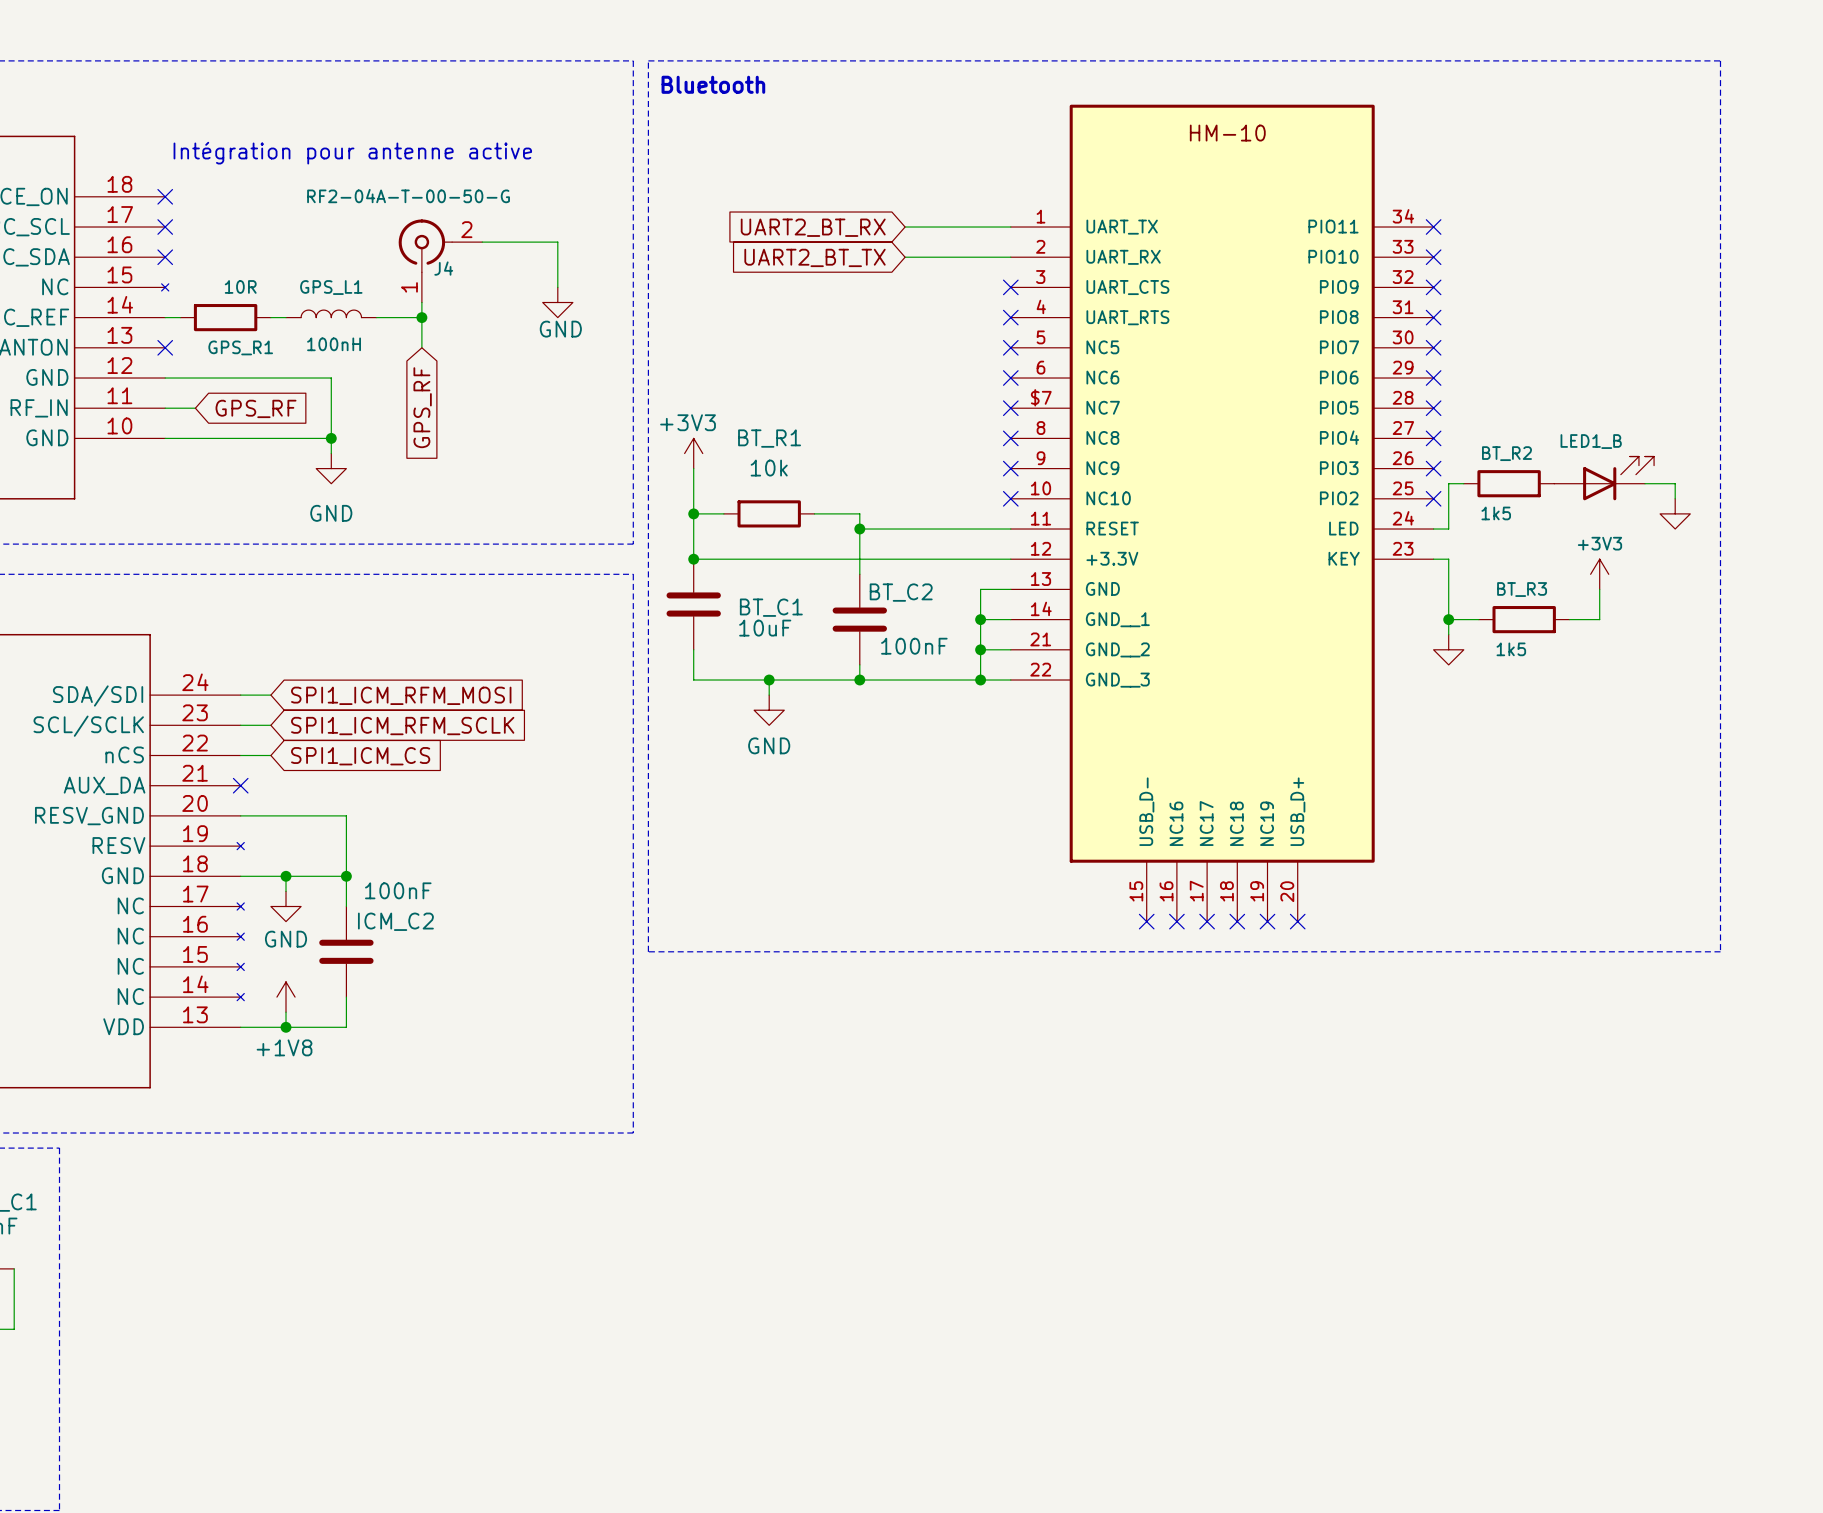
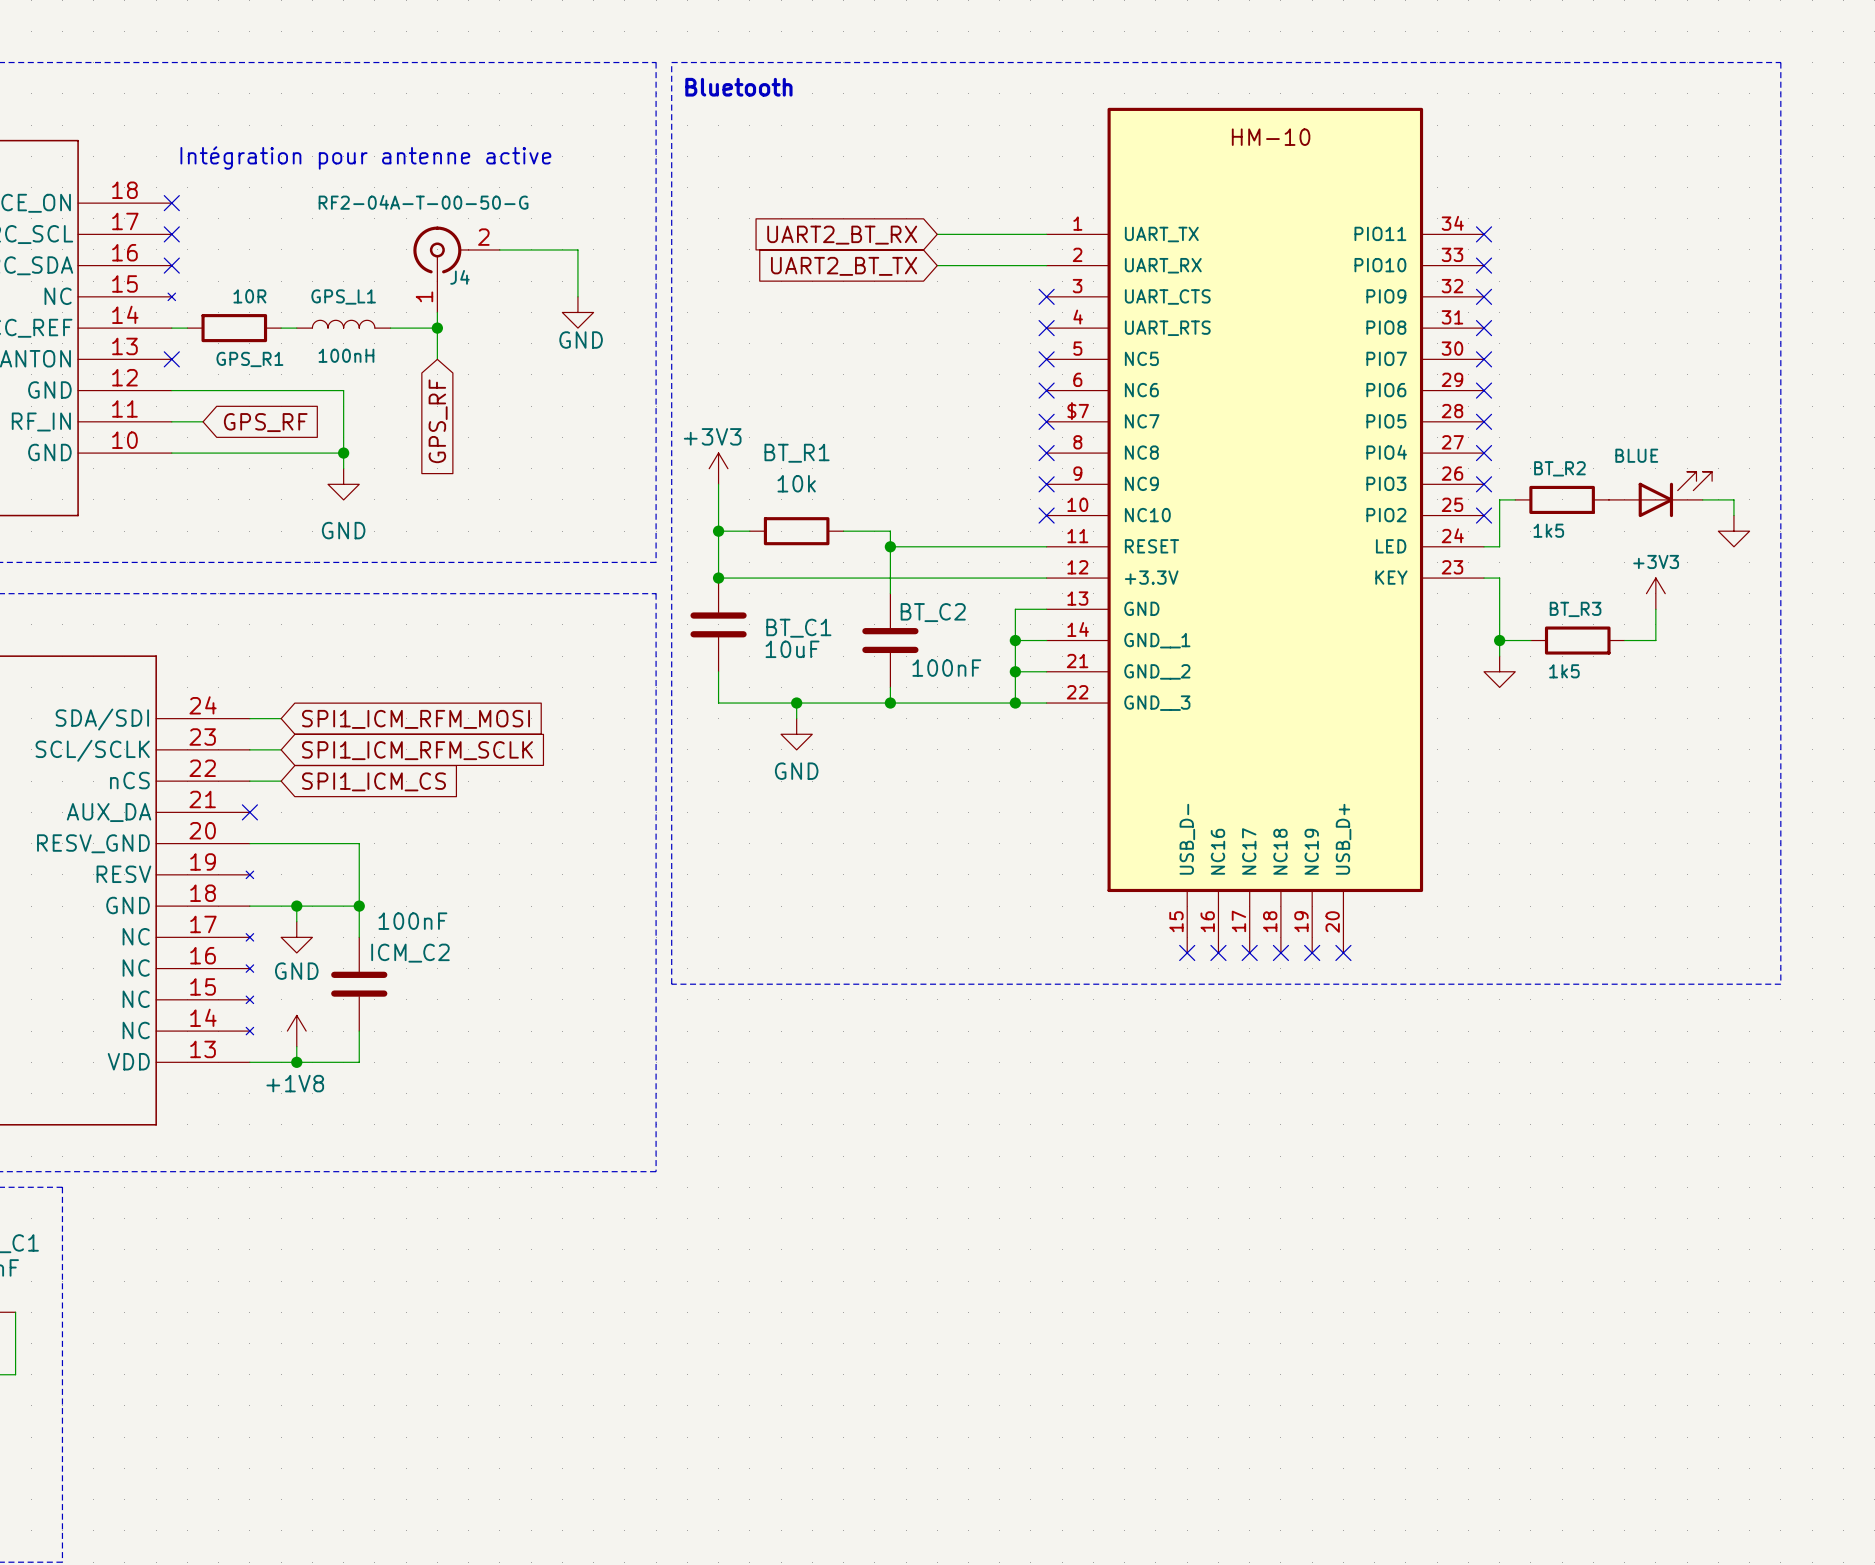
part value: LED1_B (1591, 441) -> BLUE (1636, 455)

